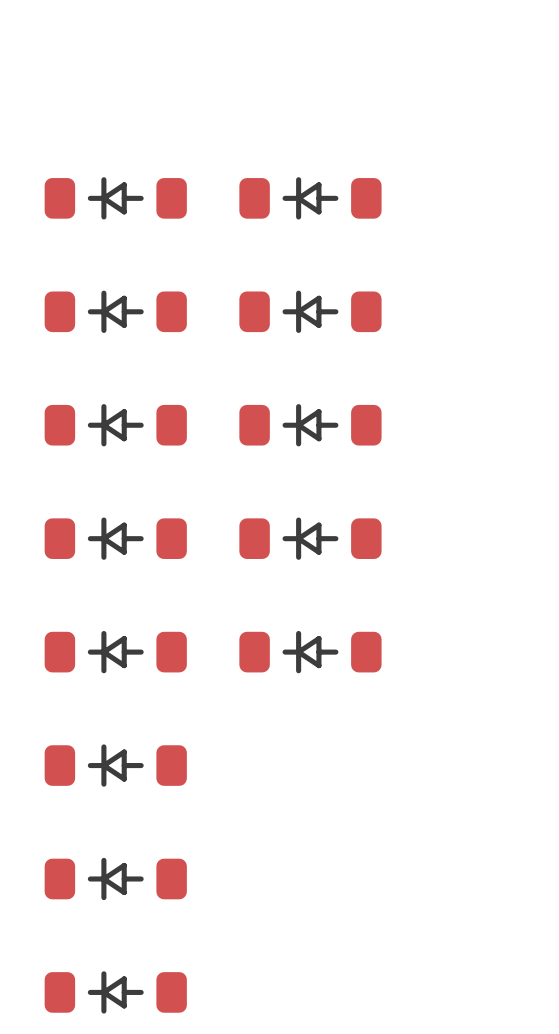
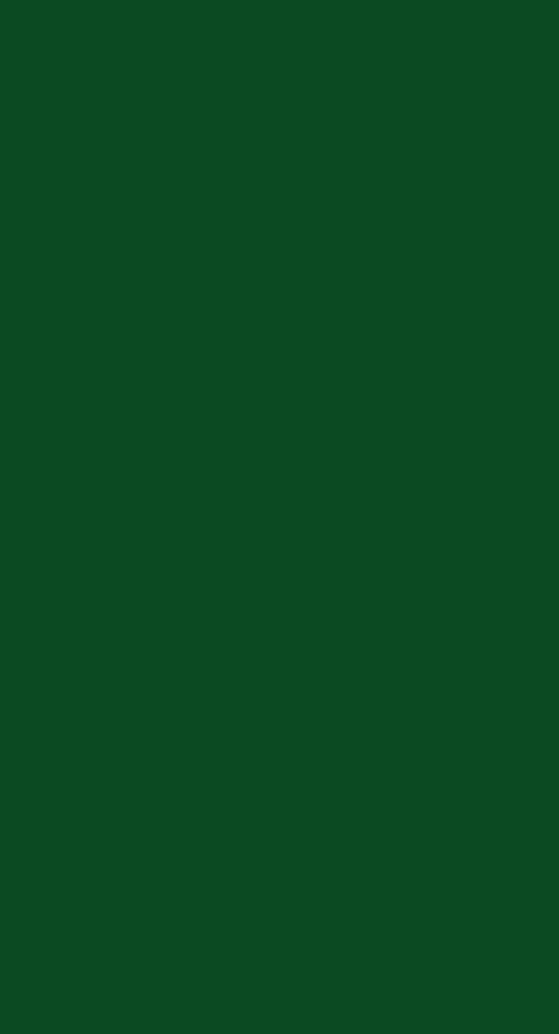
part: (115, 198) -> none
part: (310, 198) -> none
part: (115, 311) -> none
part: (310, 311) -> none
part: (115, 425) -> none
part: (310, 425) -> none
part: (115, 538) -> none
part: (310, 538) -> none
part: (115, 652) -> none
part: (310, 652) -> none
part: (115, 765) -> none
part: (115, 878) -> none
part: (115, 992) -> none

